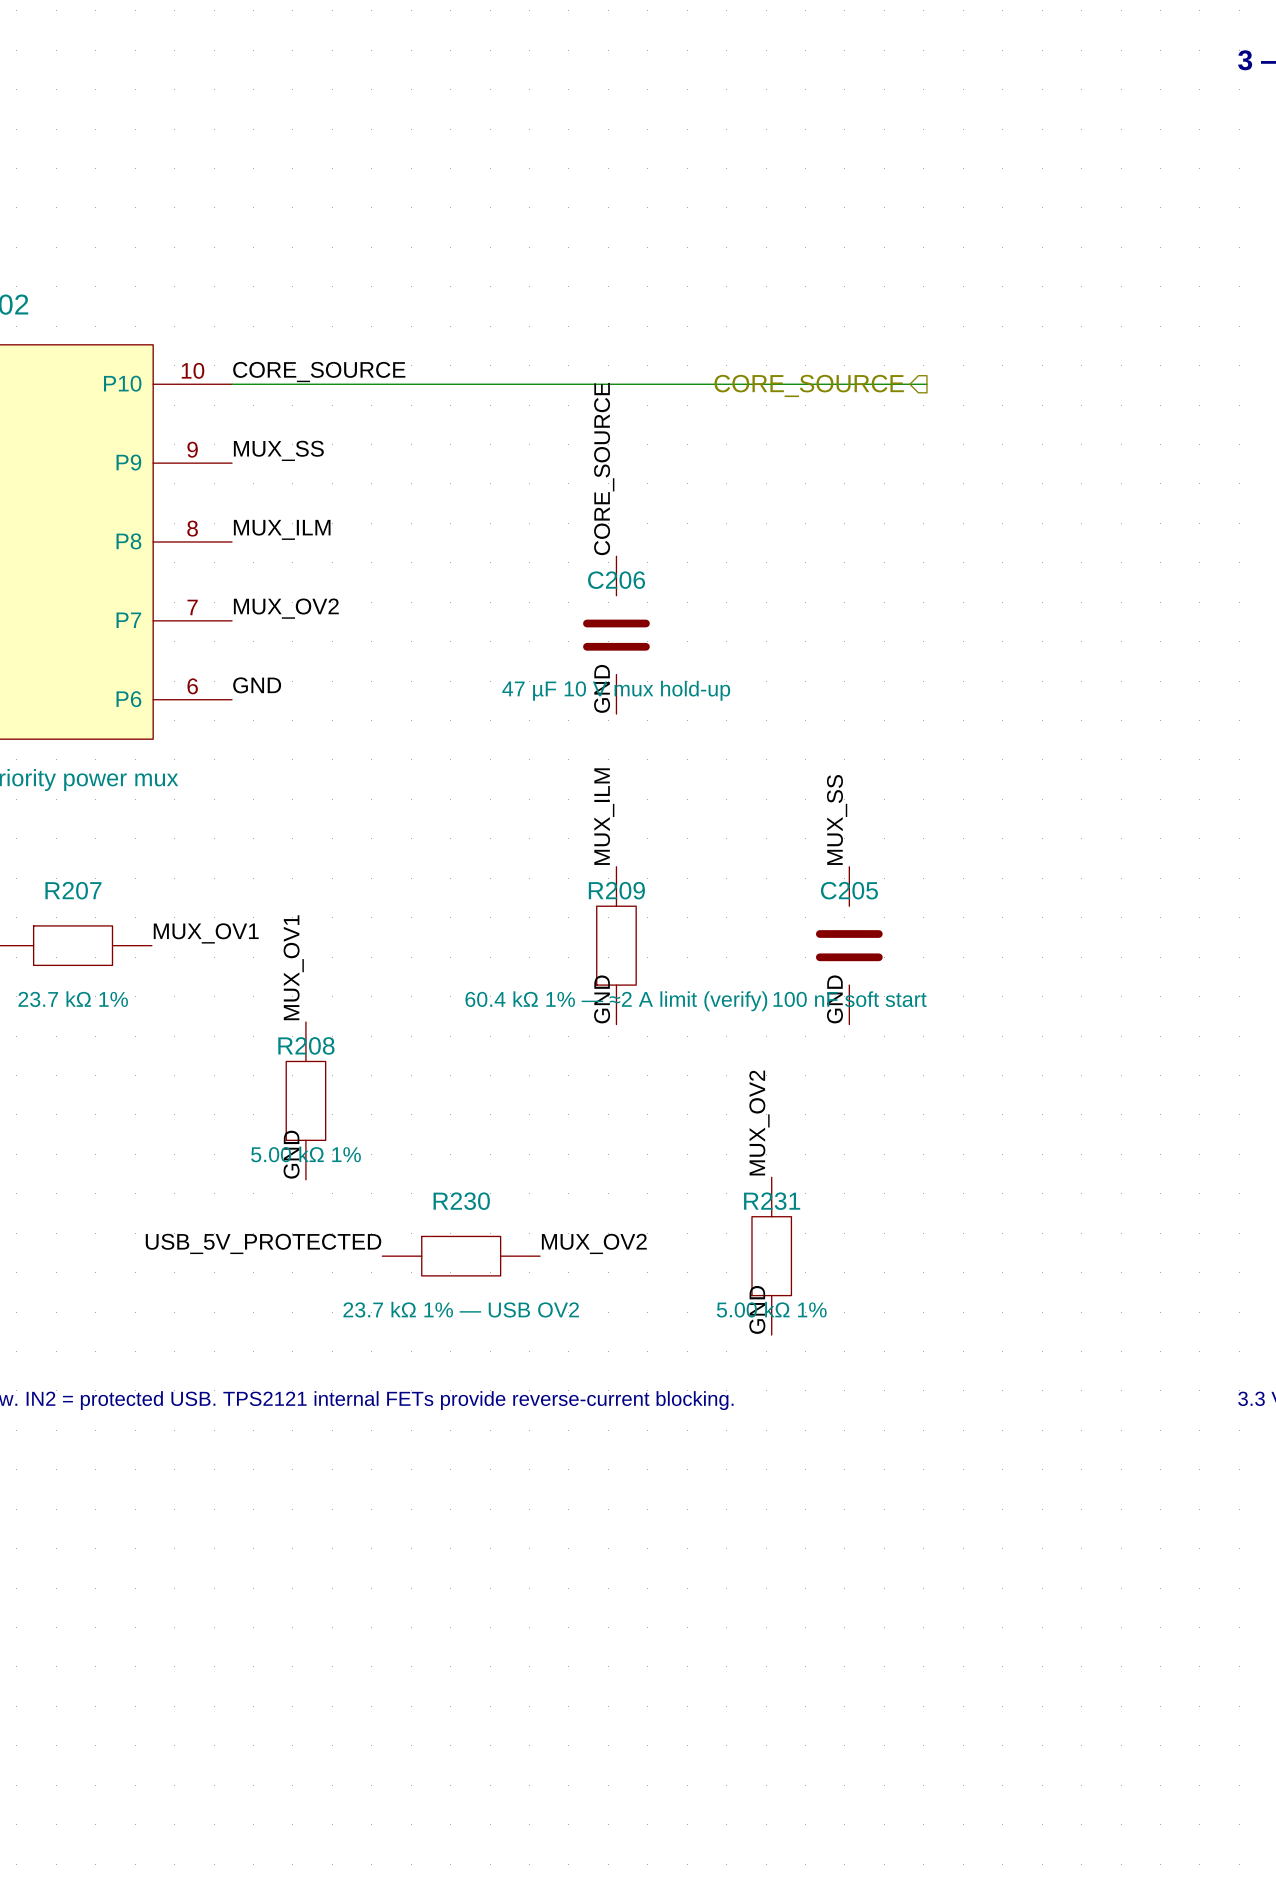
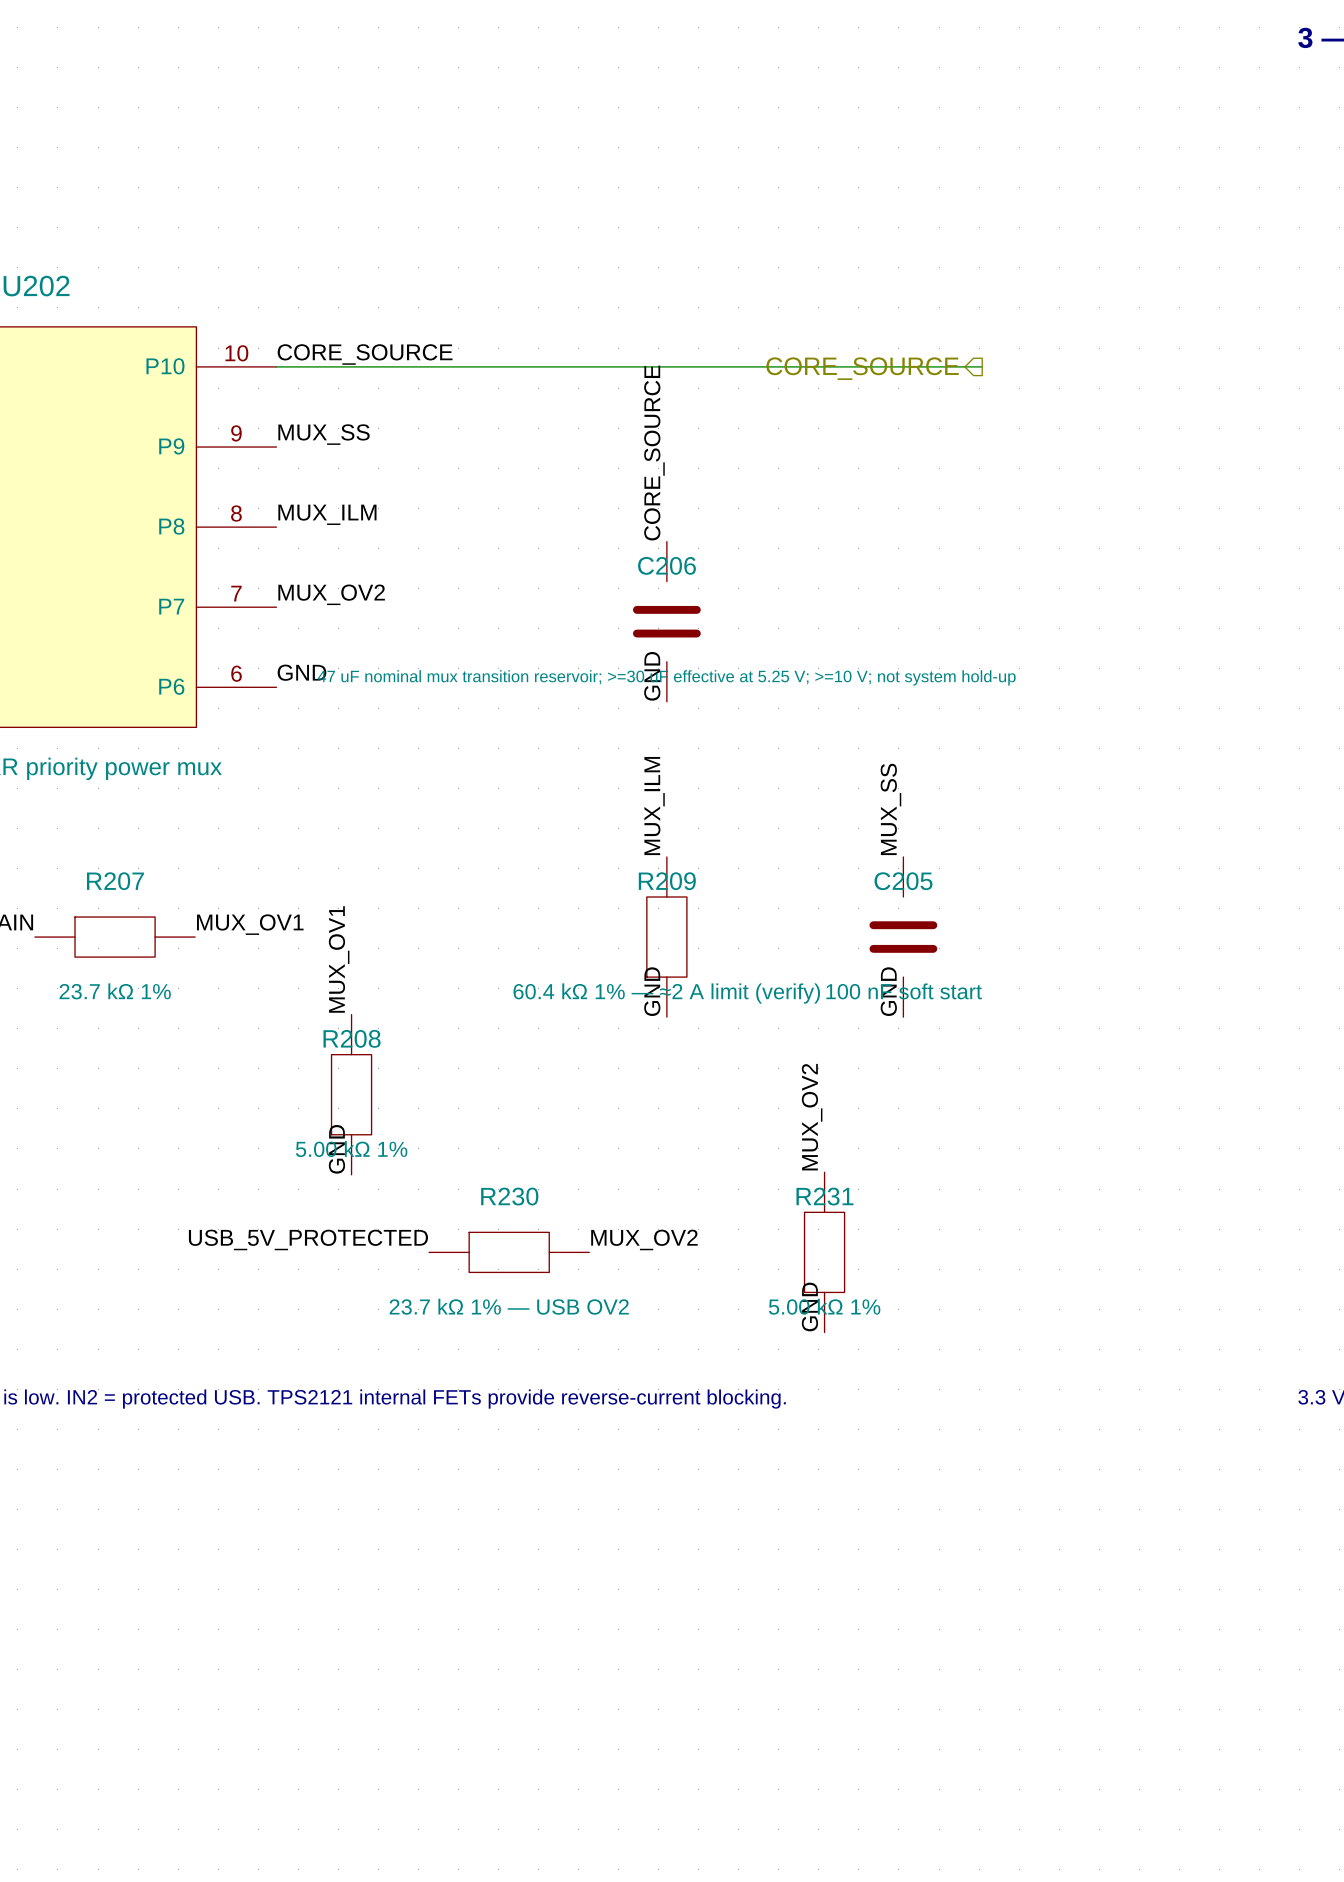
C206 value: 47 µF 10 V mux hold-up (616, 690) -> 47 uF nominal mux transition reservoir; >=30 uF effective at 5.25 V; >=10 V; not system hold-up (666, 677)

